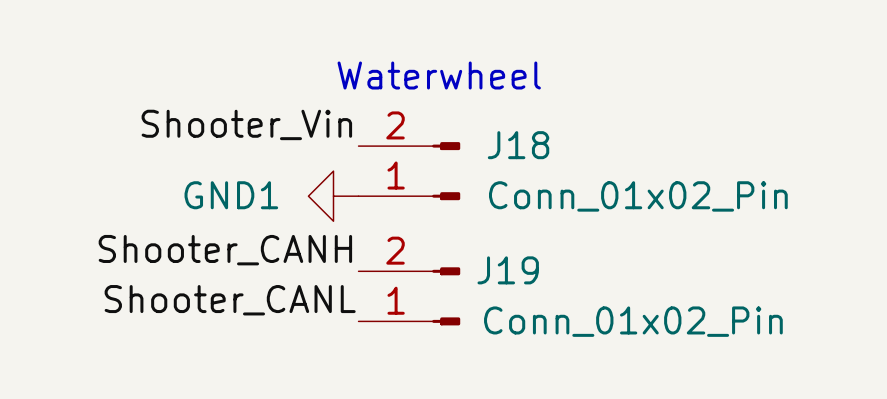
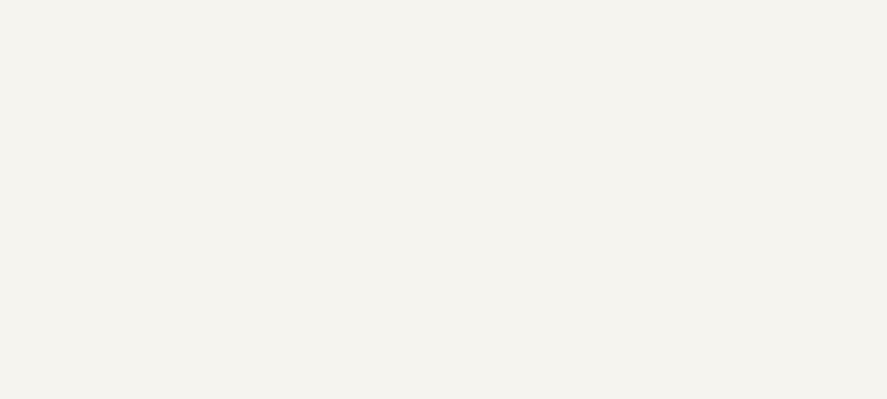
text: Waterwheel (439, 75) -> none
label: Shooter_Vin (246, 124) -> none
J18: Conn_01x02_Pin (409, 171) -> none
power symbol: GND1 (333, 196) -> none
label: Shooter_CANH (225, 250) -> none
J19: Conn_01x02_Pin (409, 296) -> none
label: Shooter_CANL (230, 300) -> none

